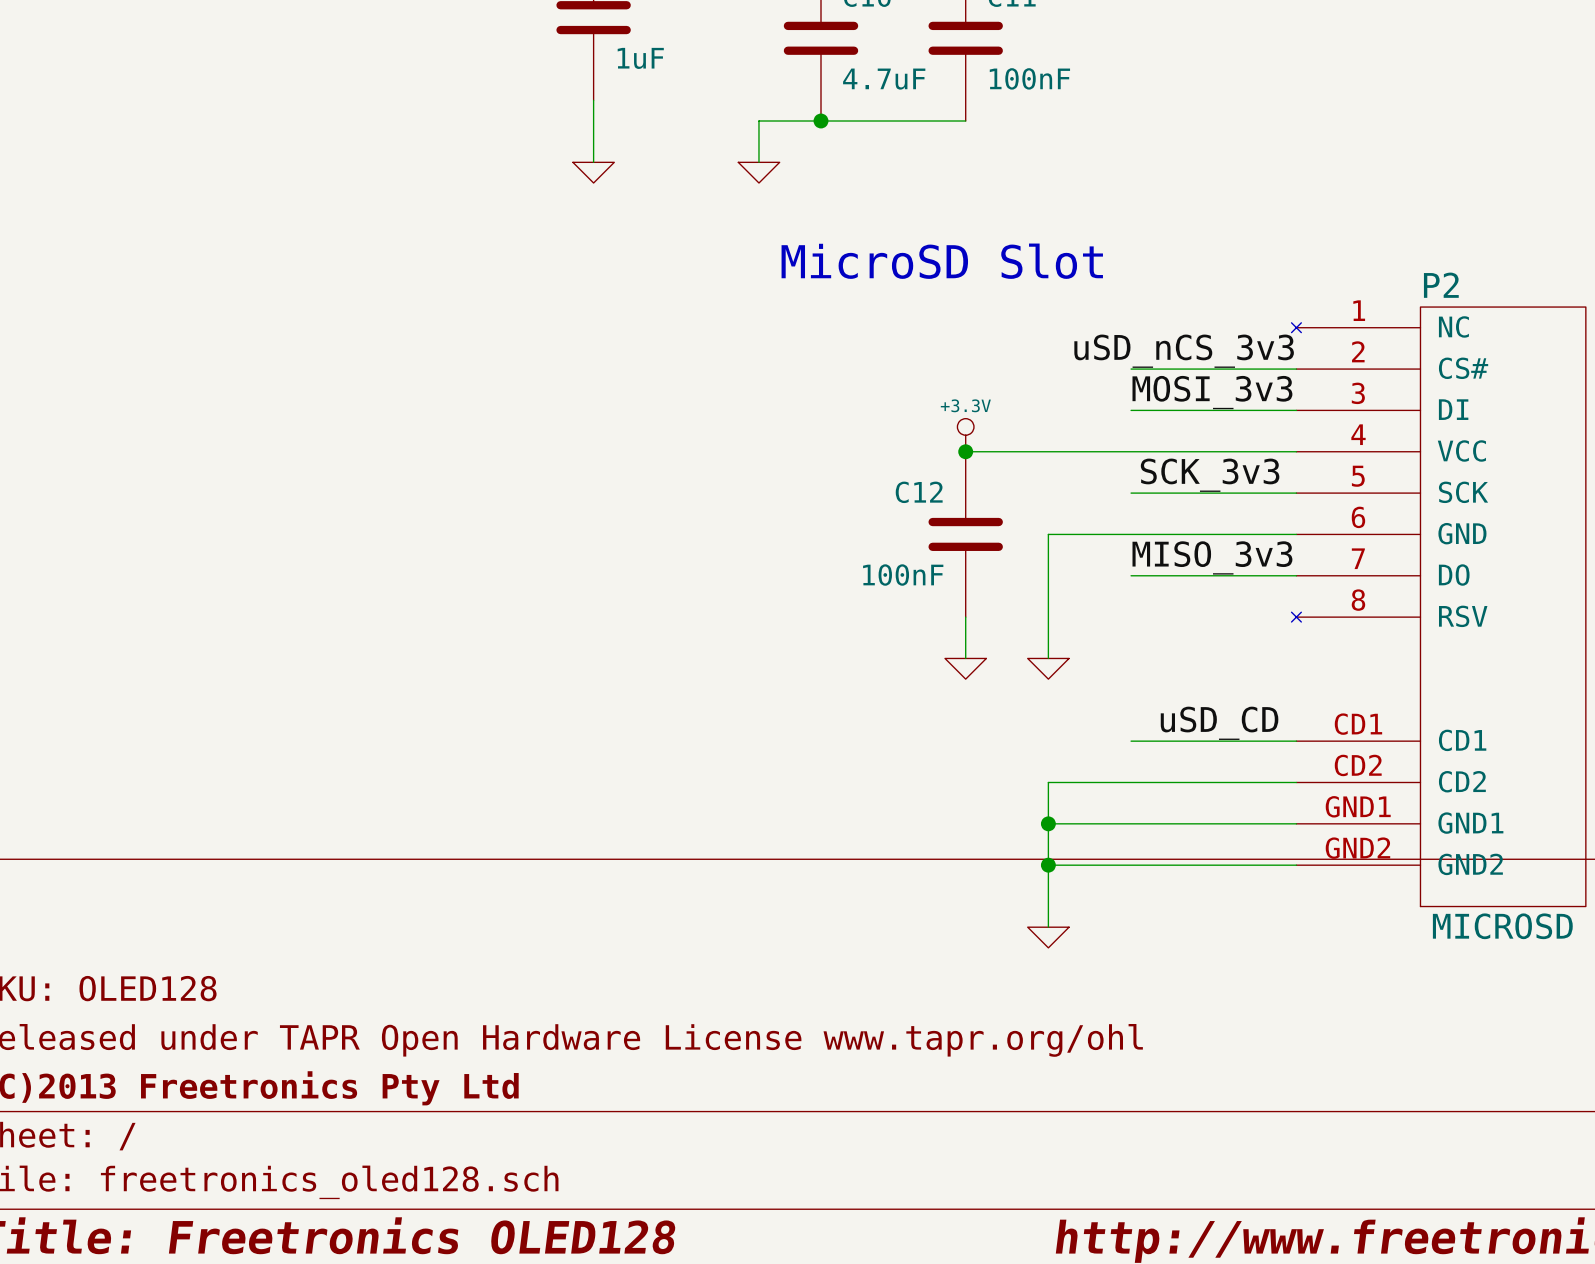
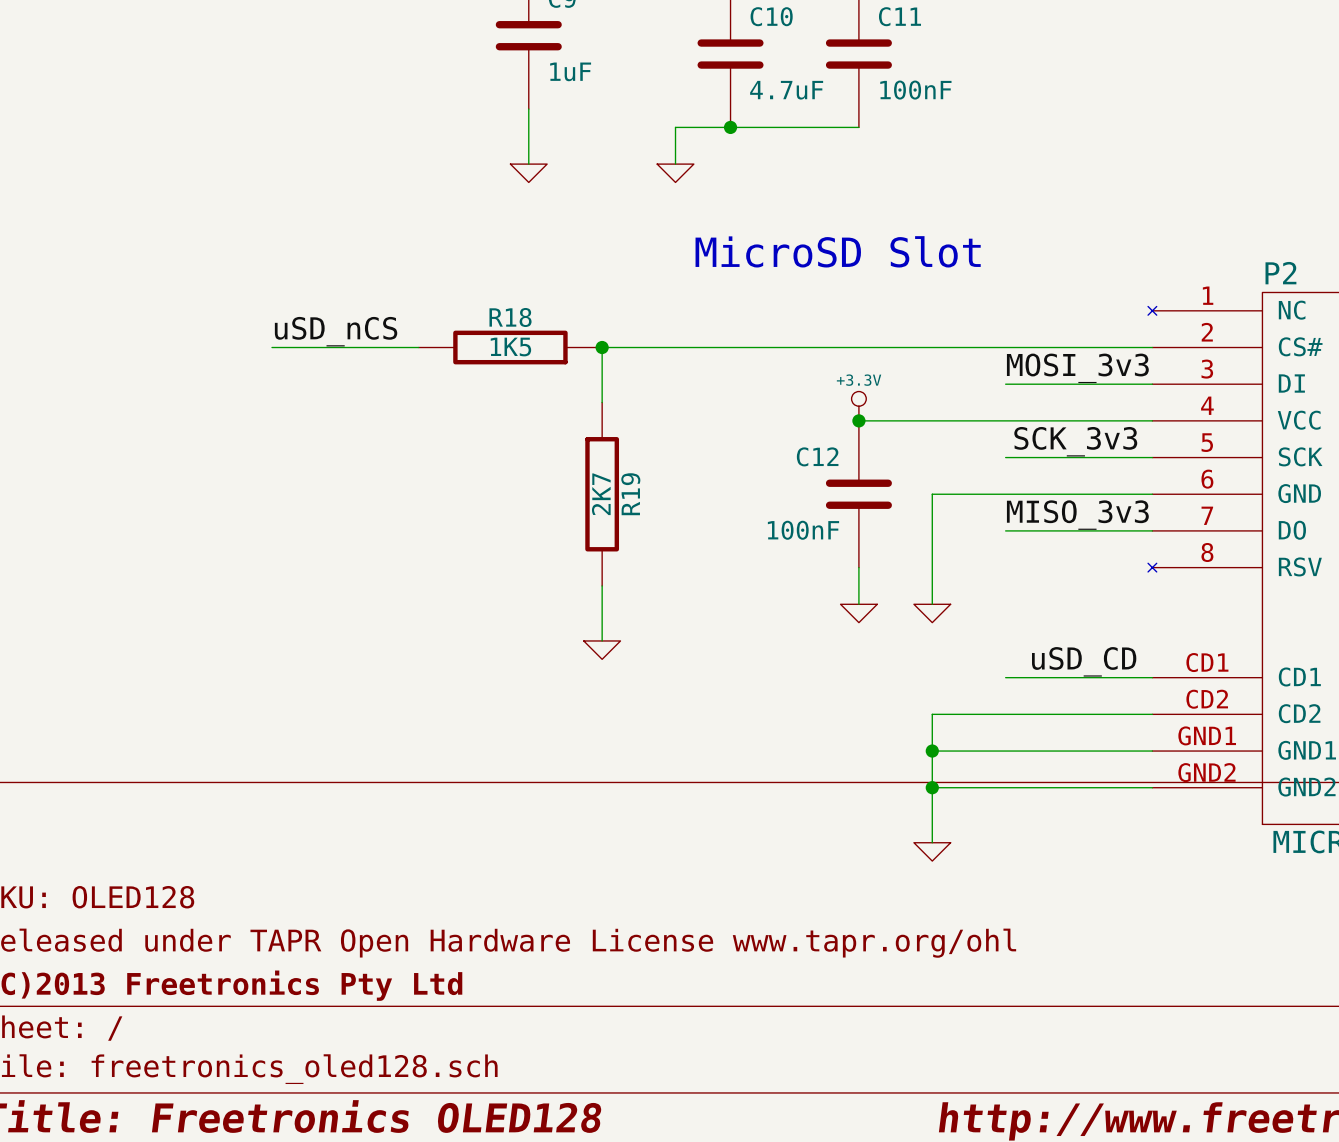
label: none -> uSD_nCS (336, 331)
label: uSD_nCS_3v3 (1184, 351) -> none
wire: none -> (271, 347) (418, 347)
R18: none -> 1K5 (510, 347)
junction: none -> (602, 347)
wire: none -> (1005, 347) (602, 347) (602, 402)
R19: none -> 2K7 (602, 494)
wire: none -> (602, 585) (602, 640)
power symbol: none -> (602, 650)

